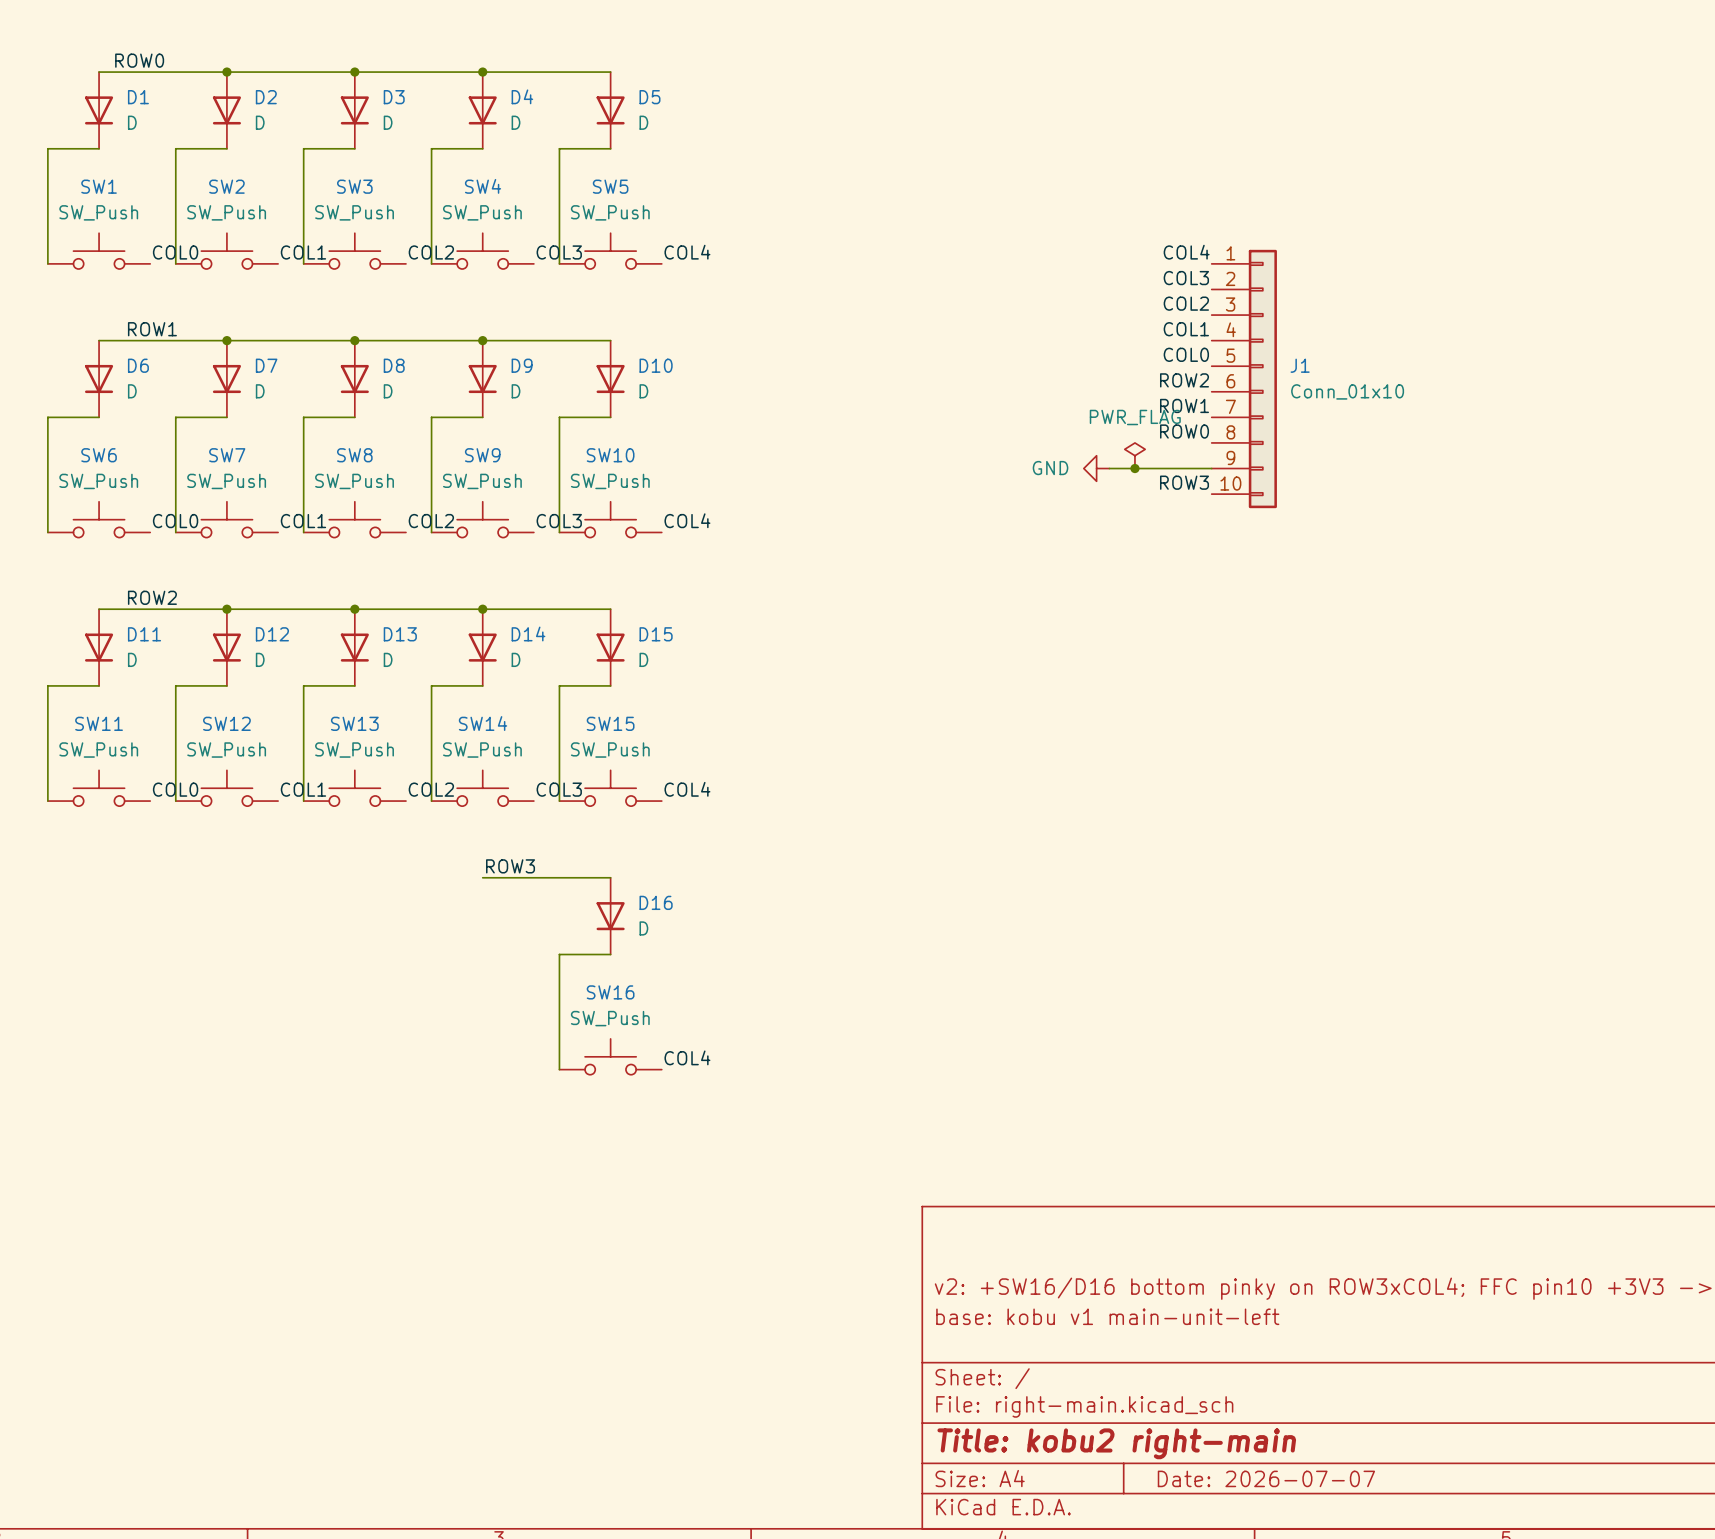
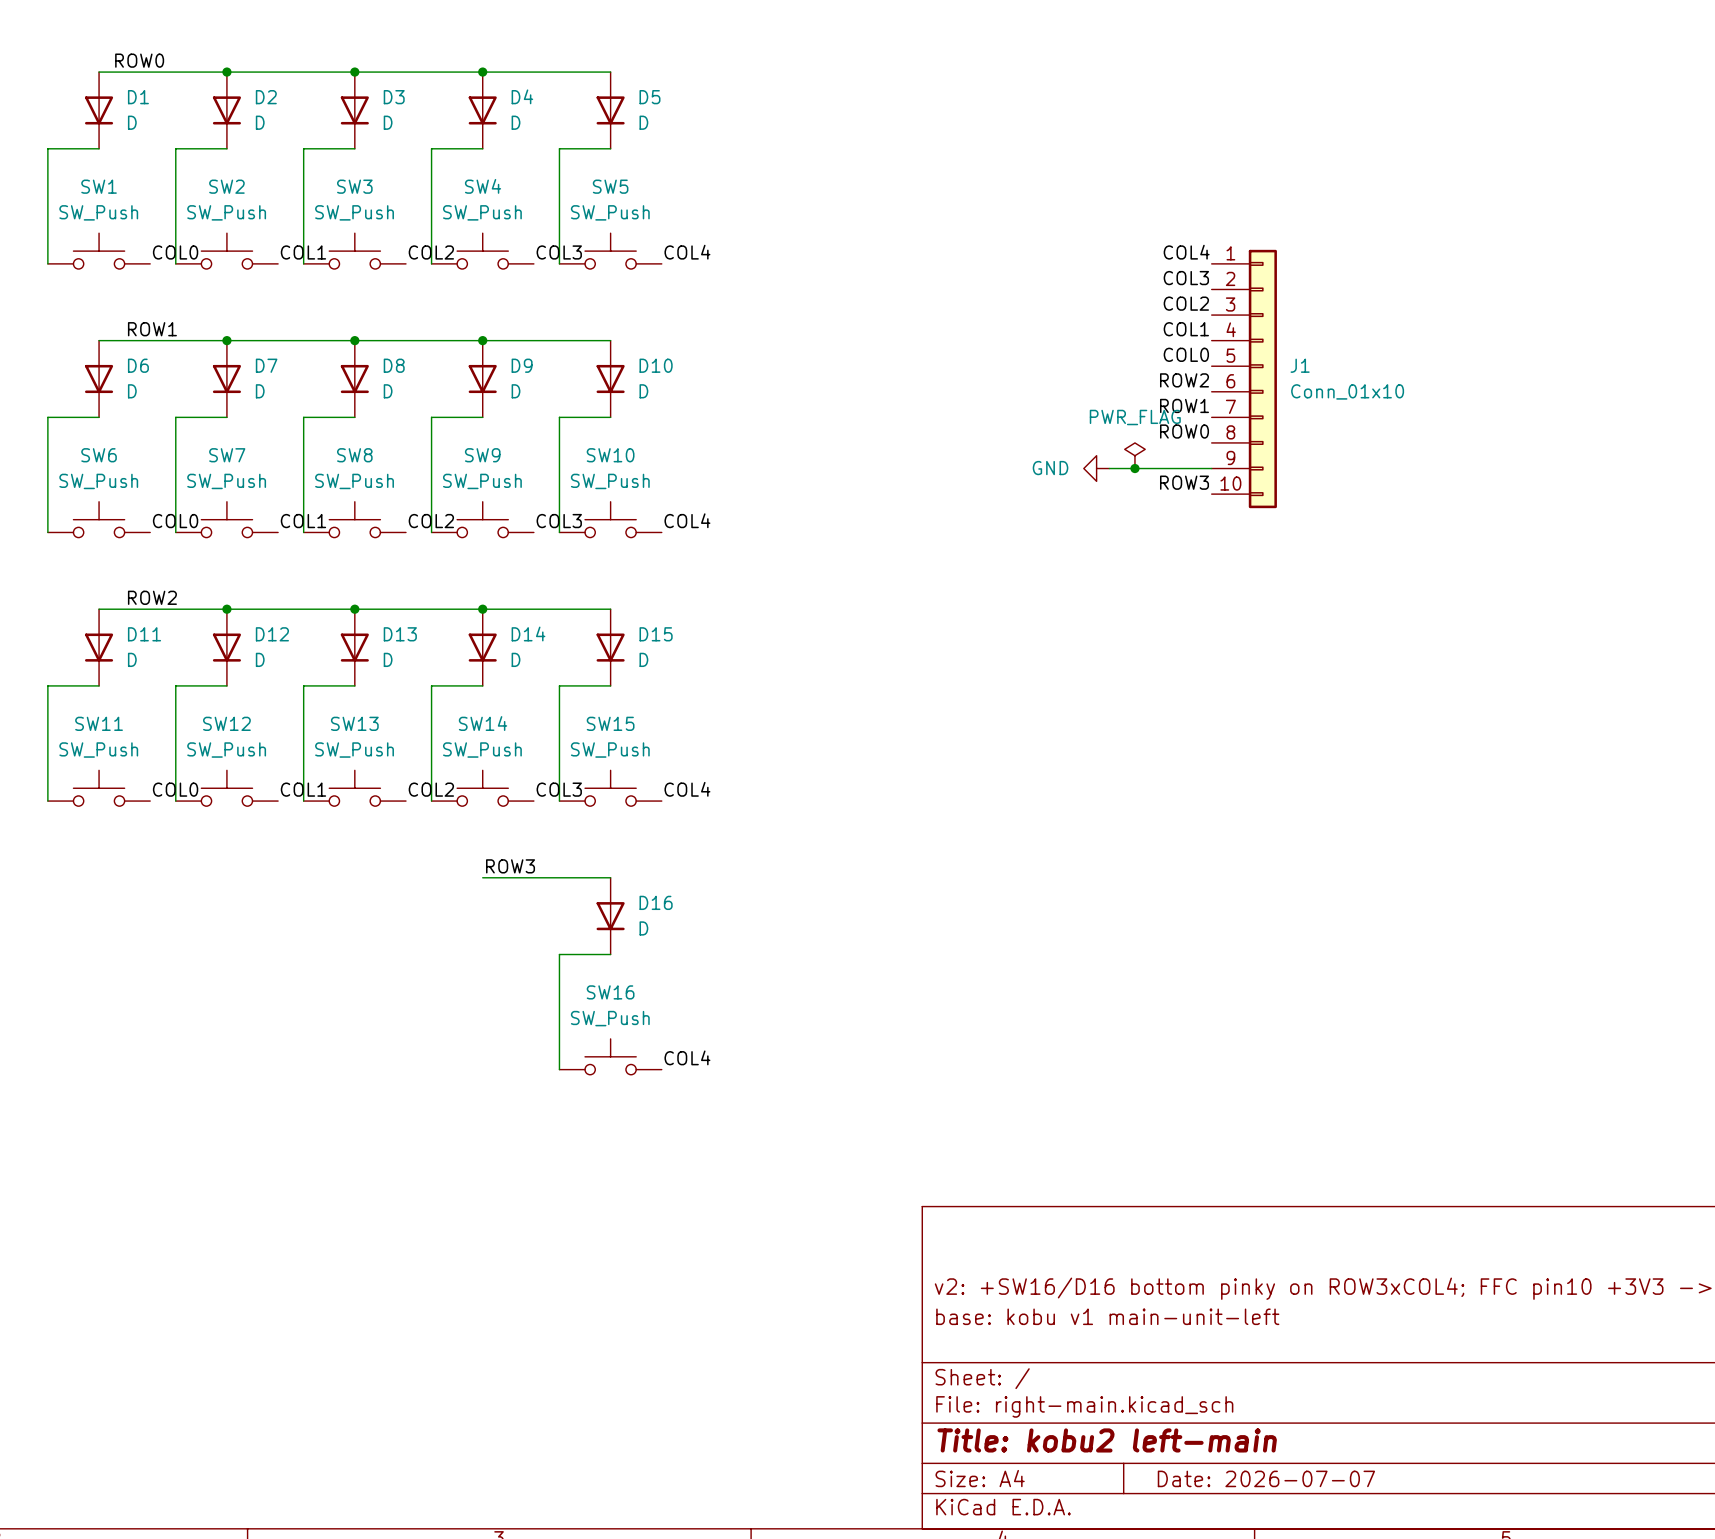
title block: Title: kobu2 right-main (1116, 1443) -> Title: kobu2 left-main (1107, 1440)

